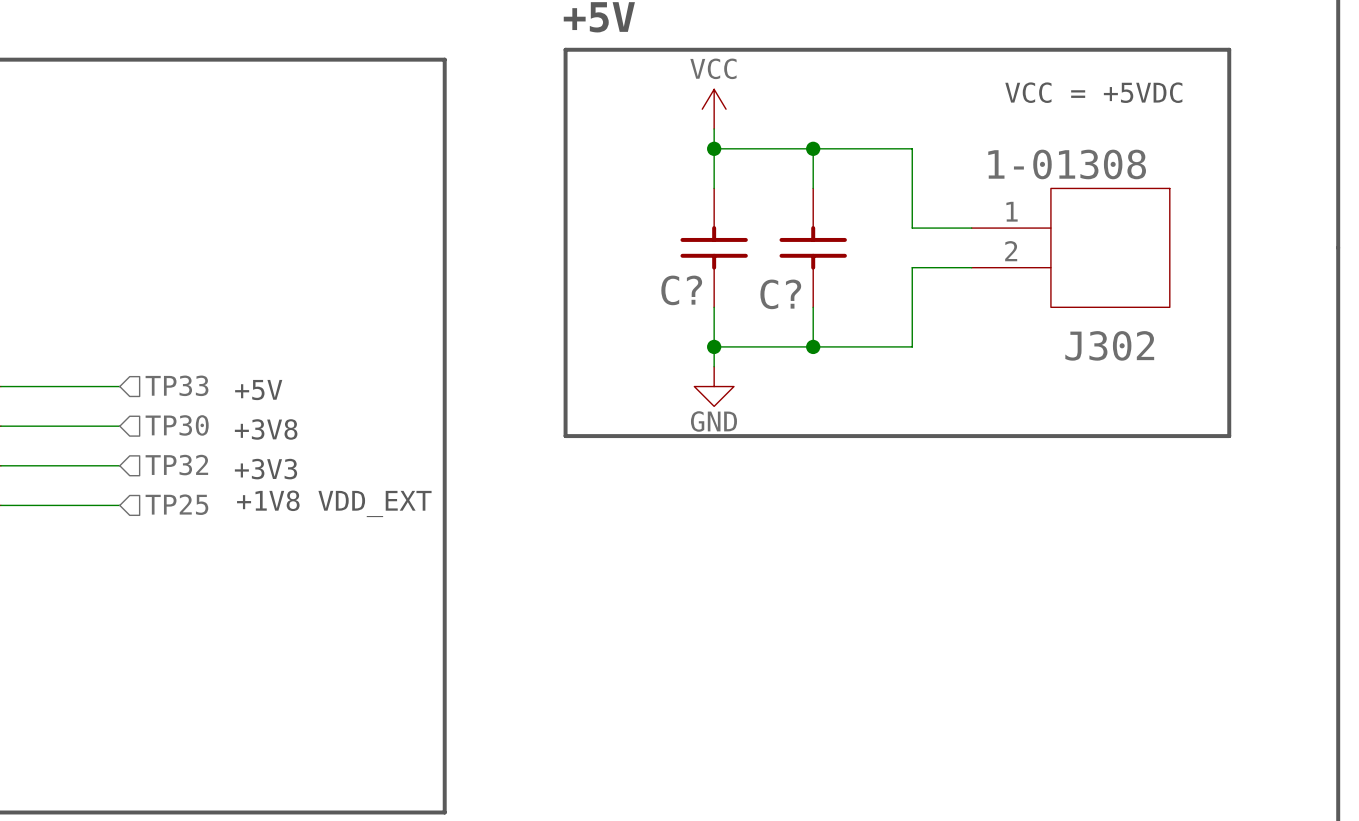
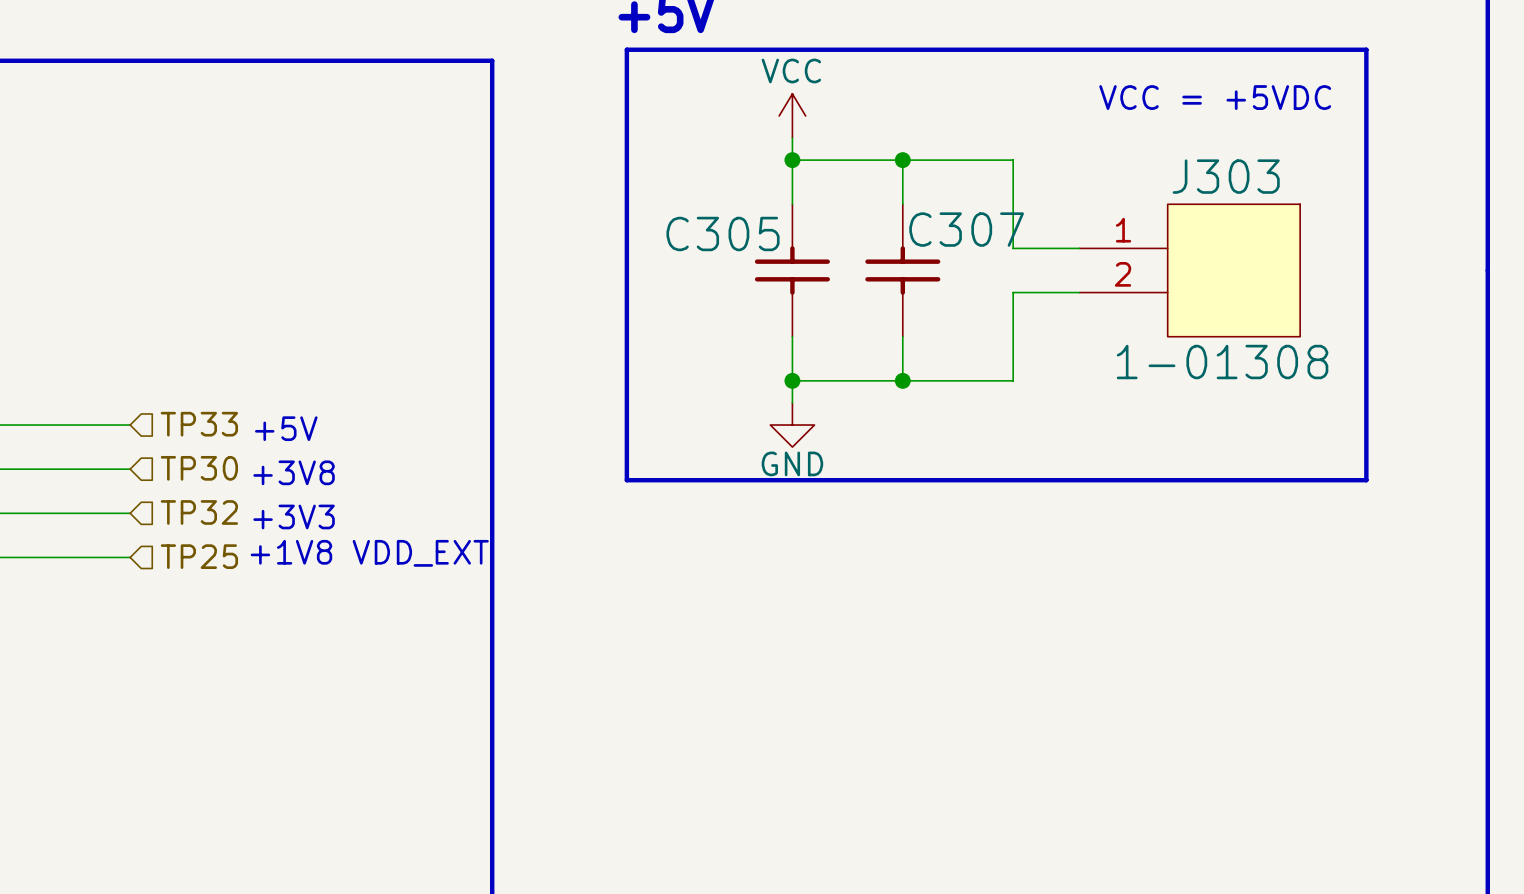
J302 text position: 1-01308 (1067, 164) -> 1-01308 (1222, 362)
C? name: C? (681, 290) -> C305 (723, 233)
C? name: C? (780, 294) -> C307 (966, 229)
J302 name: J302 (1109, 345) -> J303 (1226, 176)

